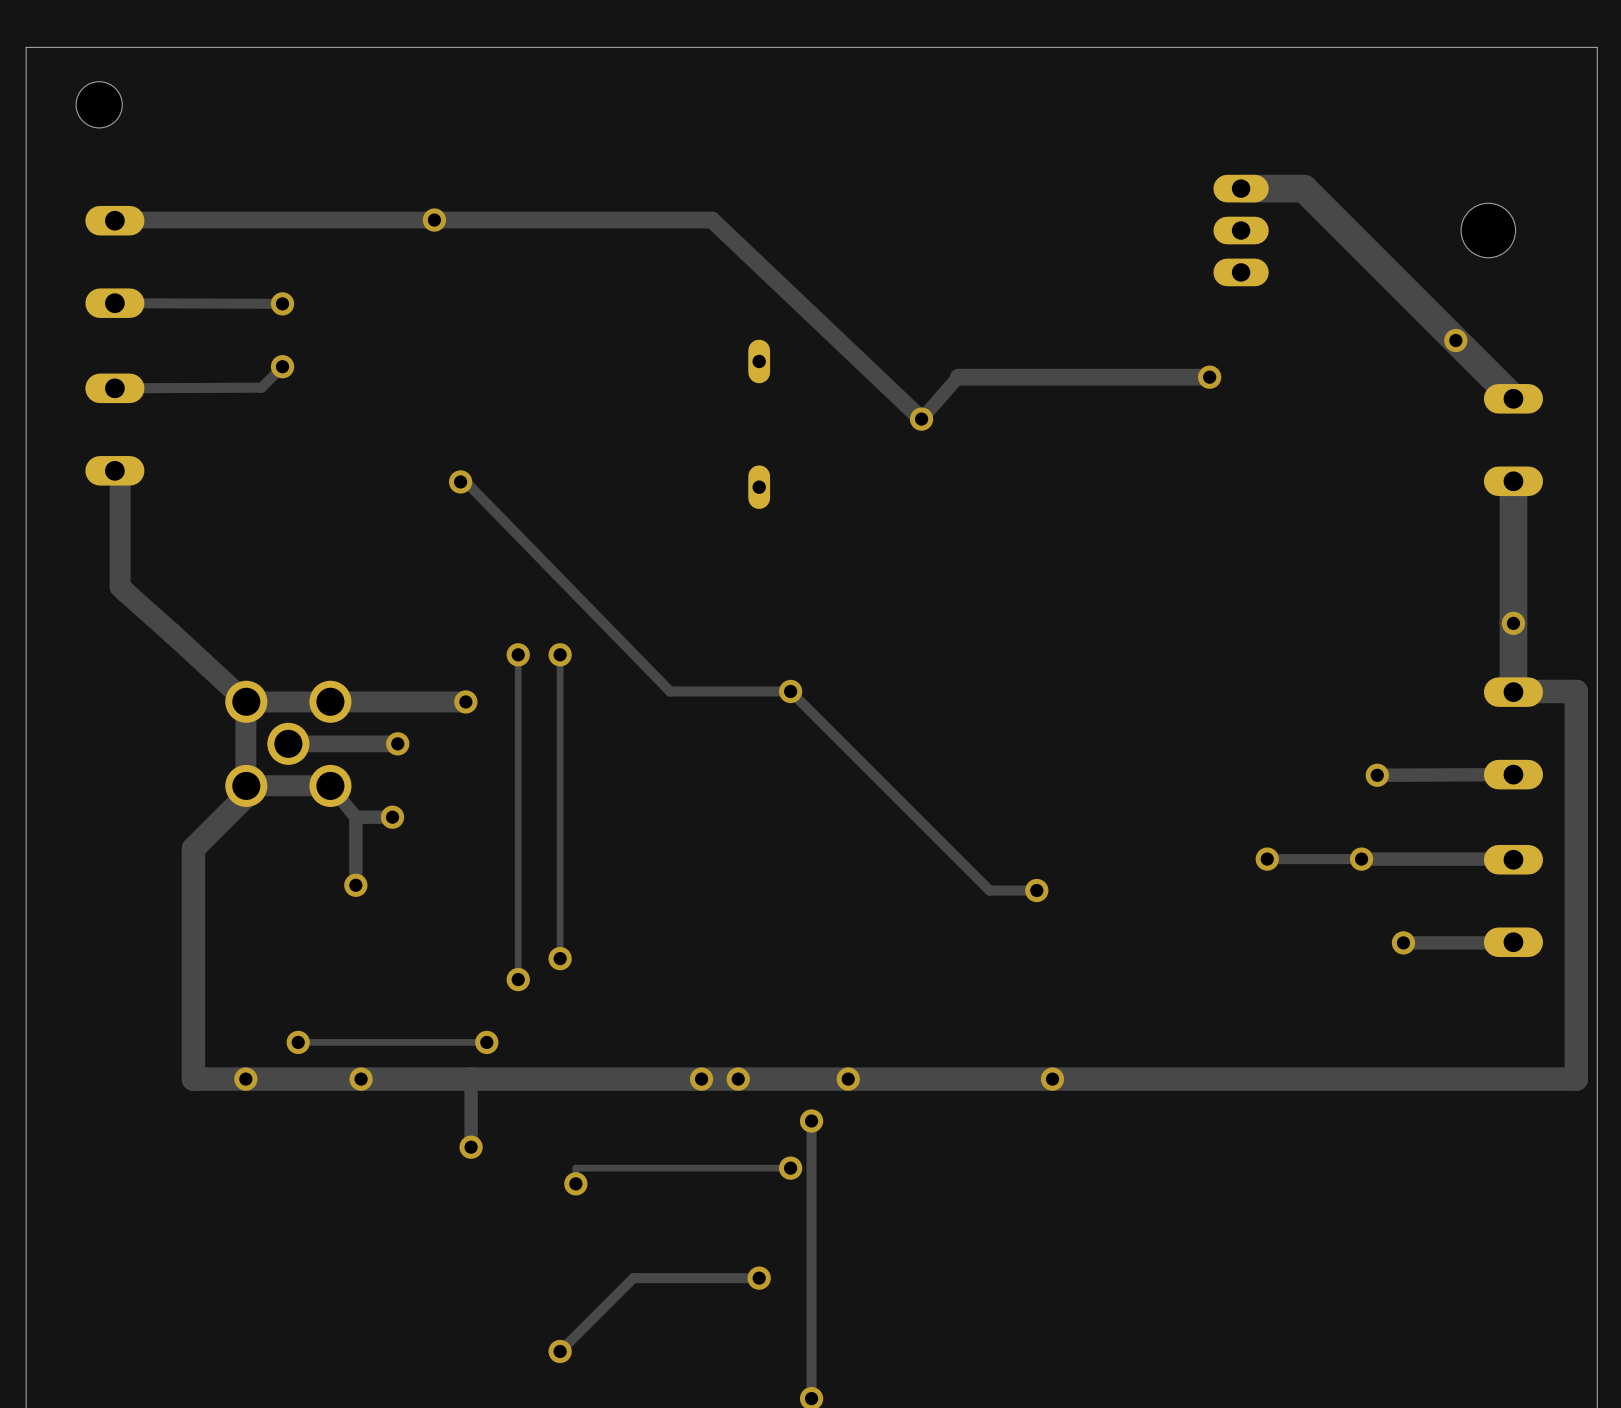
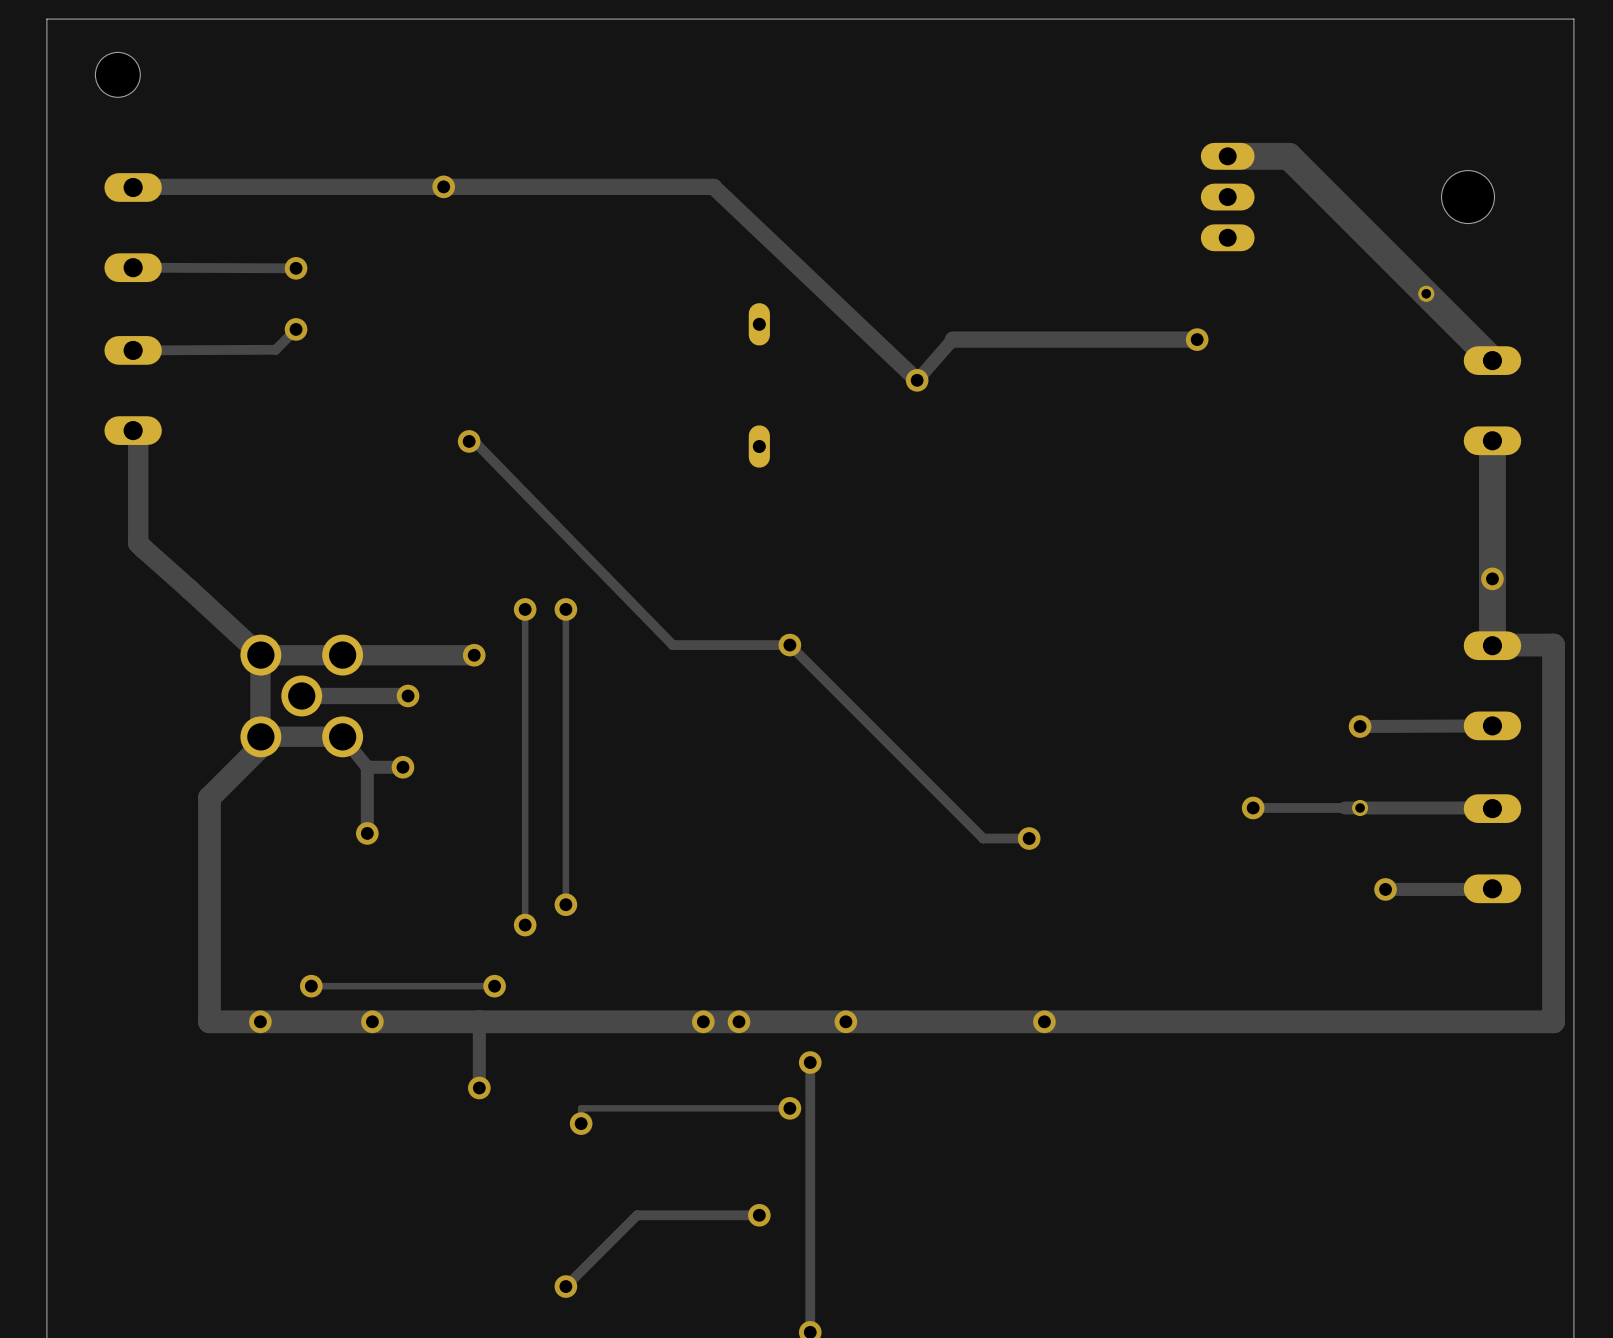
via position: (1455, 340) -> (1426, 293)
via position: (1361, 859) -> (1360, 807)

